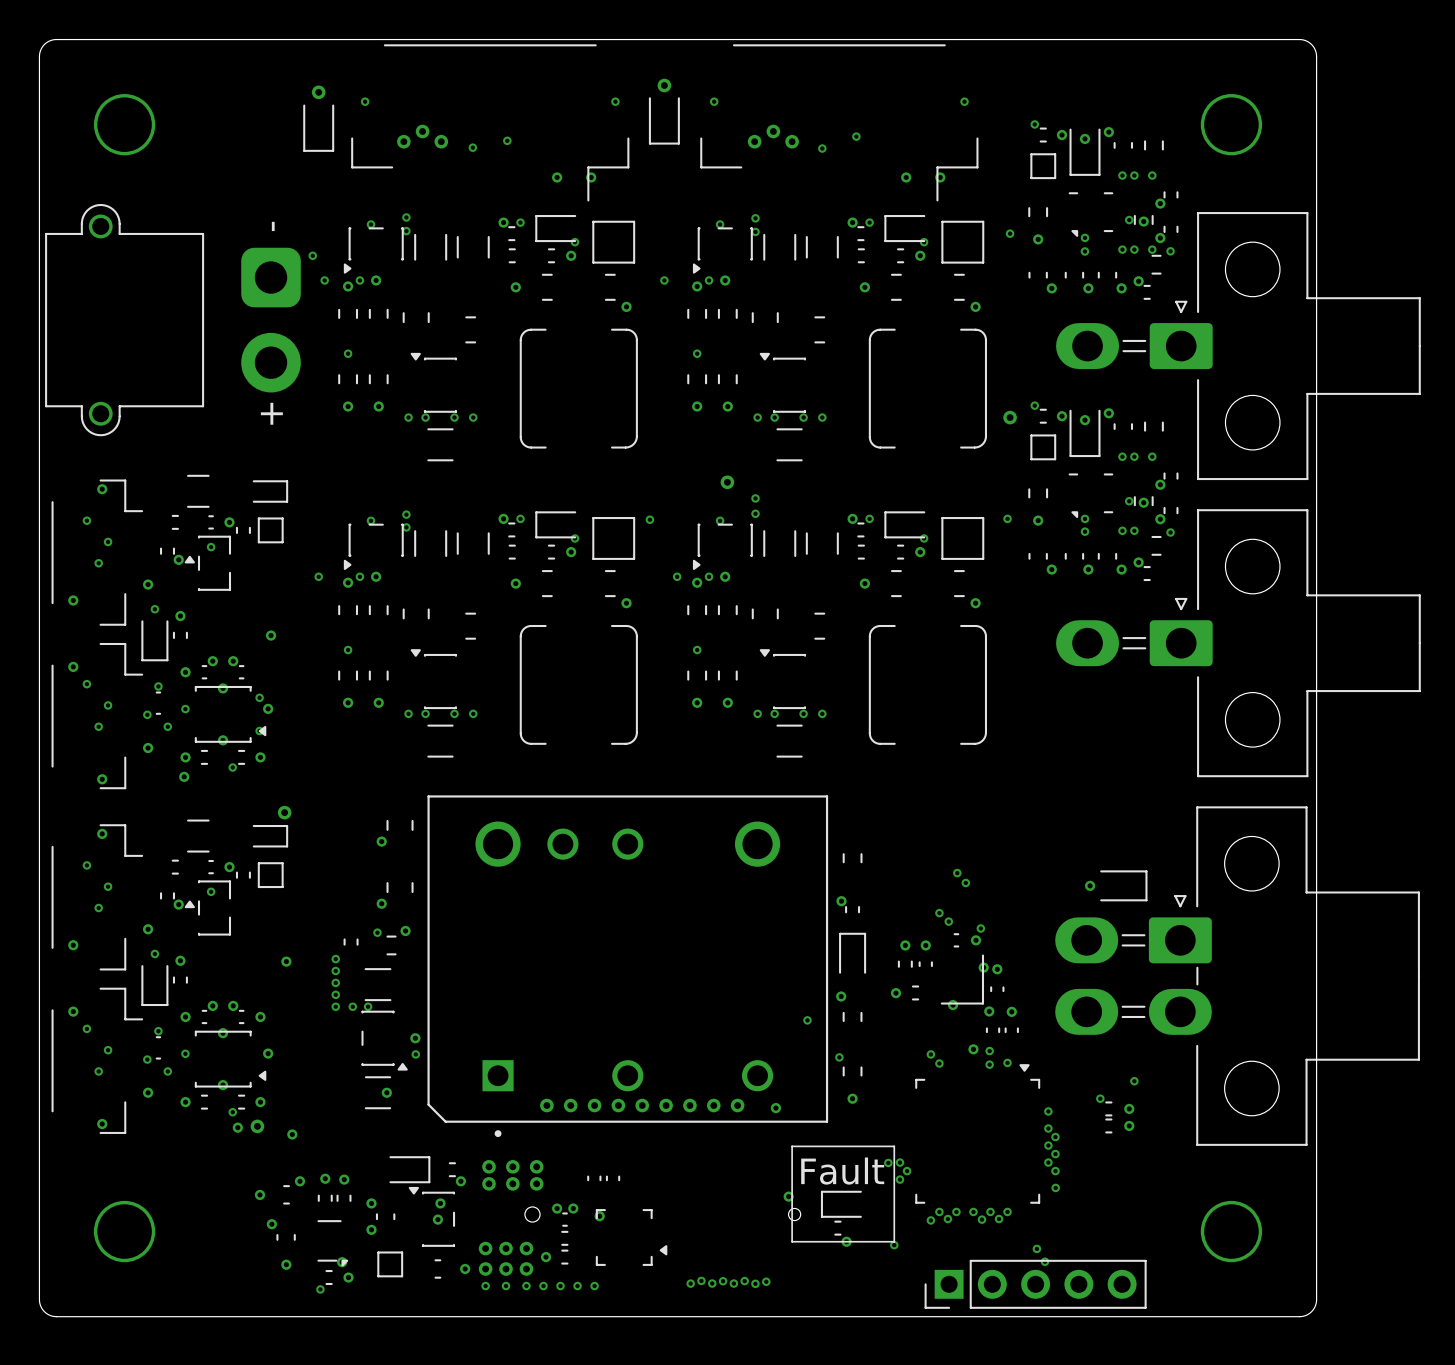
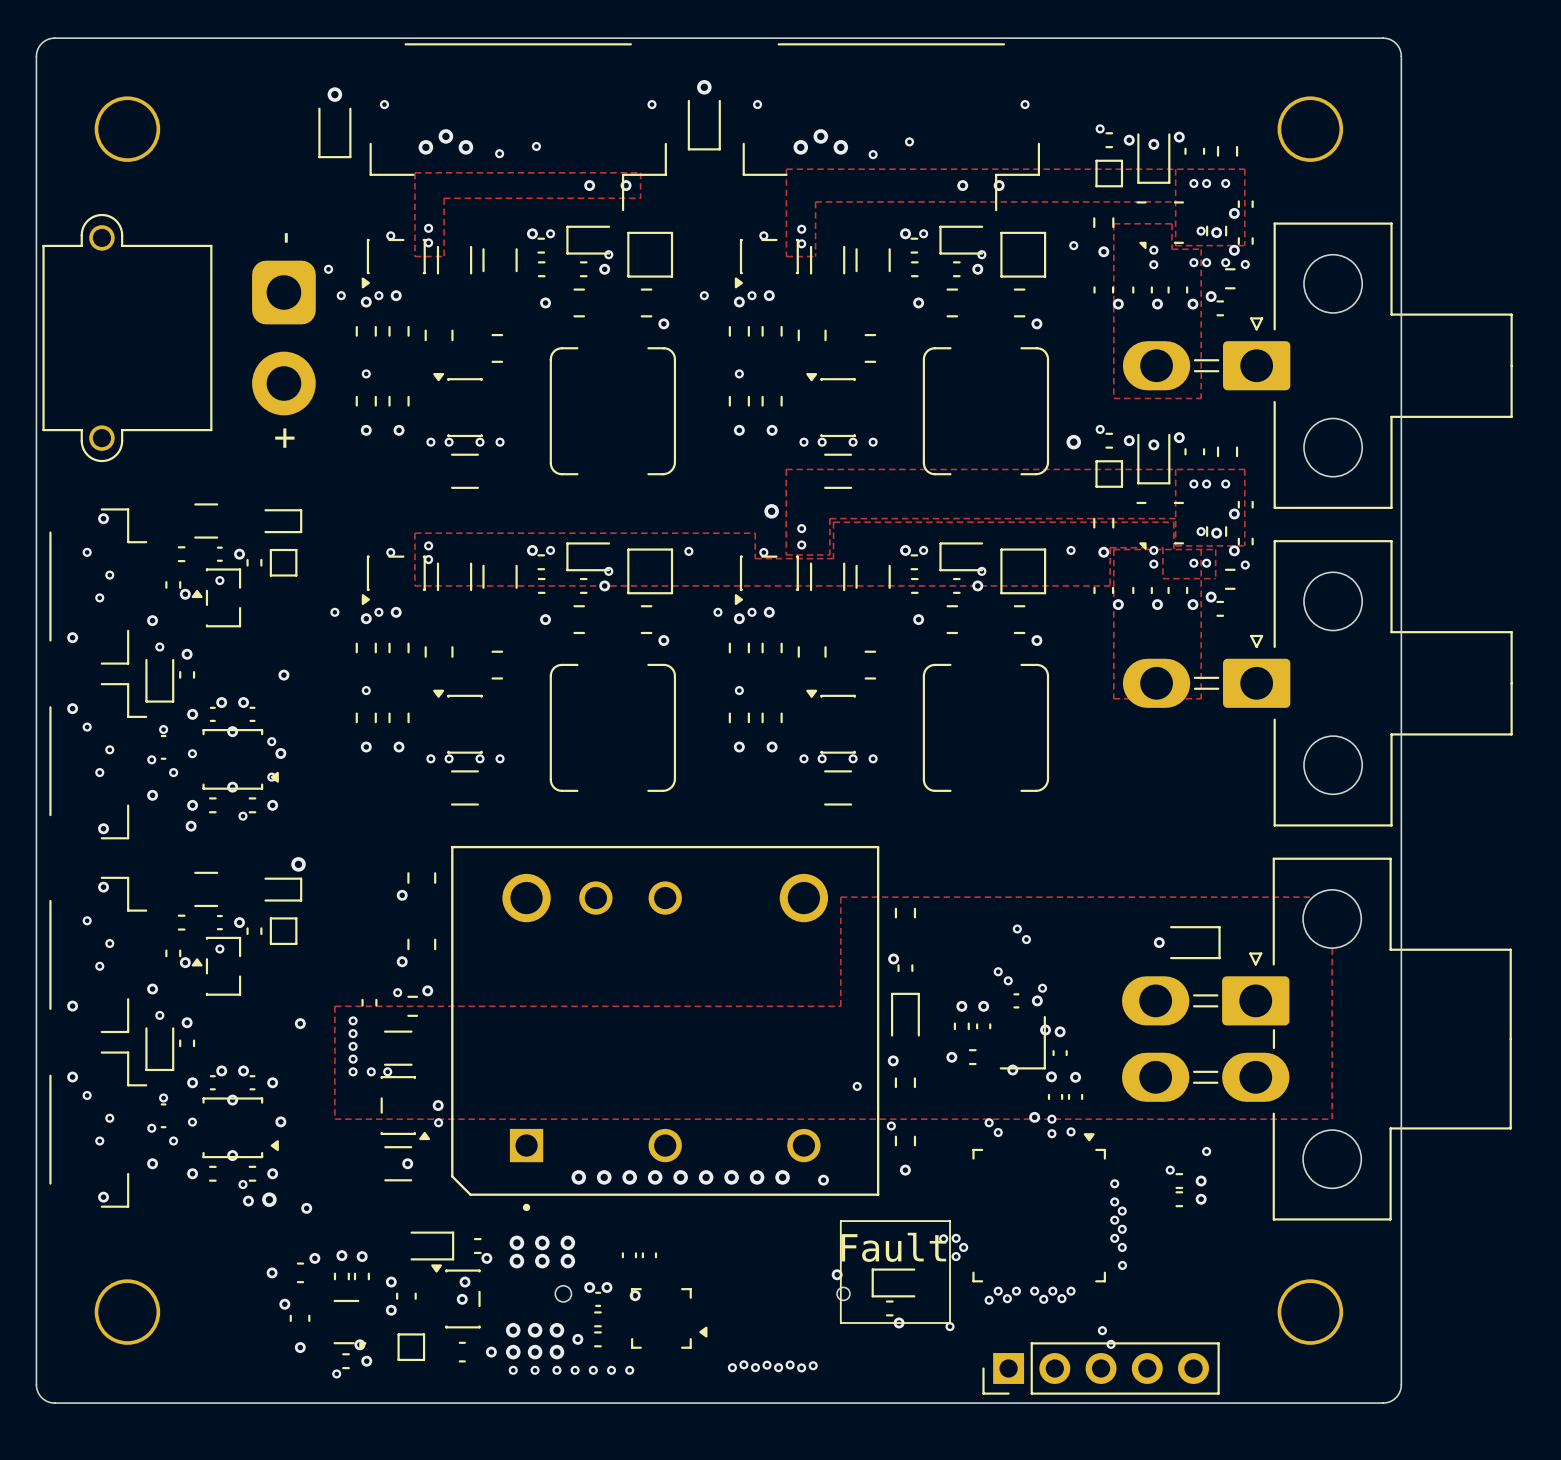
zone outline: none -> (1175, 169) (1175, 245) (1244, 245) (1244, 169) (786, 169) (786, 256) (815, 256) (815, 201) (1175, 201)
zone outline: none -> (414, 172) (414, 256) (444, 256) (444, 198) (640, 198) (640, 172) (414, 172)
zone outline: none -> (1113, 223) (1113, 398) (1201, 398) (1201, 249) (1172, 249) (1172, 223) (1113, 223)
zone outline: none -> (1175, 469) (1175, 545) (1244, 545) (1244, 469) (786, 469) (786, 555) (829, 555) (829, 518) (1175, 518)
zone outline: none -> (1173, 549) (1173, 522) (833, 522) (833, 558) (755, 558) (755, 533) (414, 533) (414, 585) (1110, 585) (1110, 547) (1162, 547) (1162, 578) (1215, 578) (1215, 549) (1113, 549) (1113, 698) (1201, 698) (1201, 549)
zone outline: none -> (840, 897) (840, 1006) (334, 1006) (334, 1119) (1332, 1119) (1332, 897) (840, 897)

